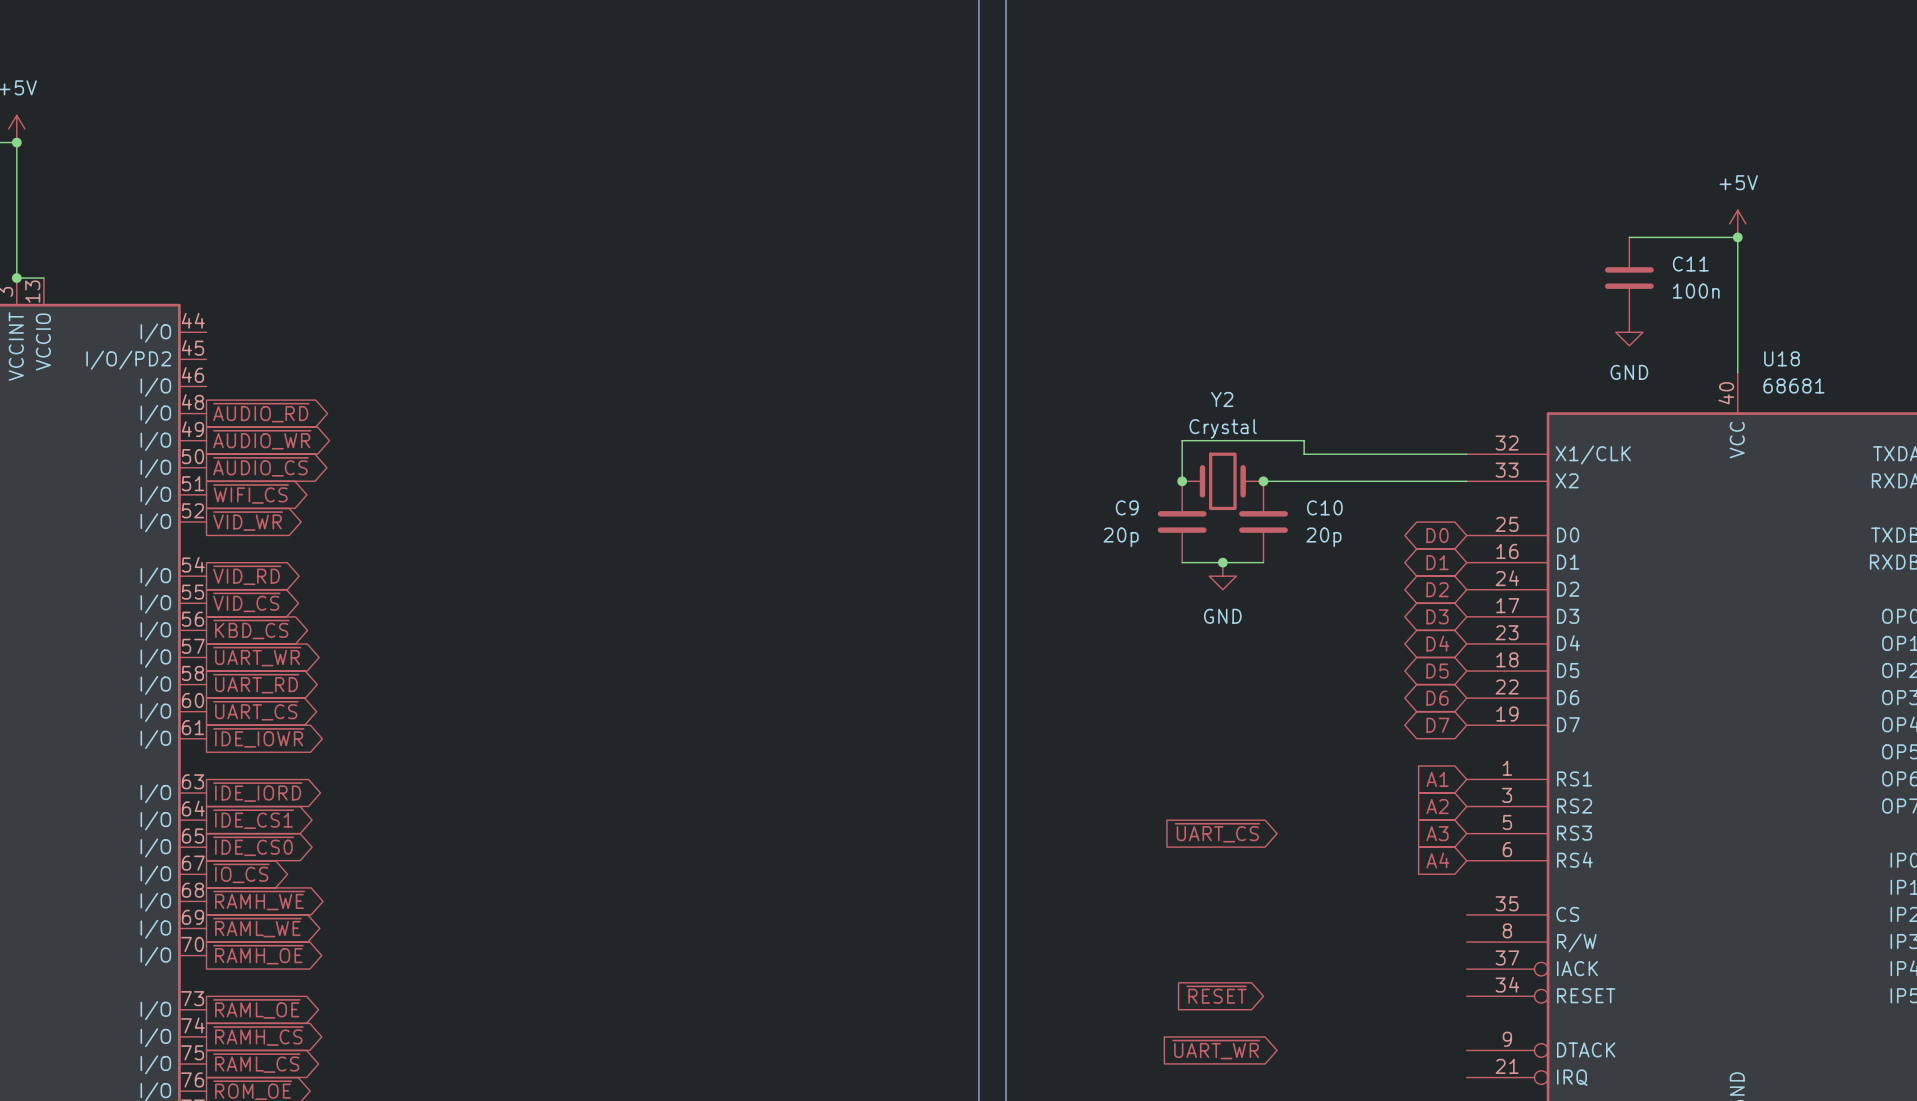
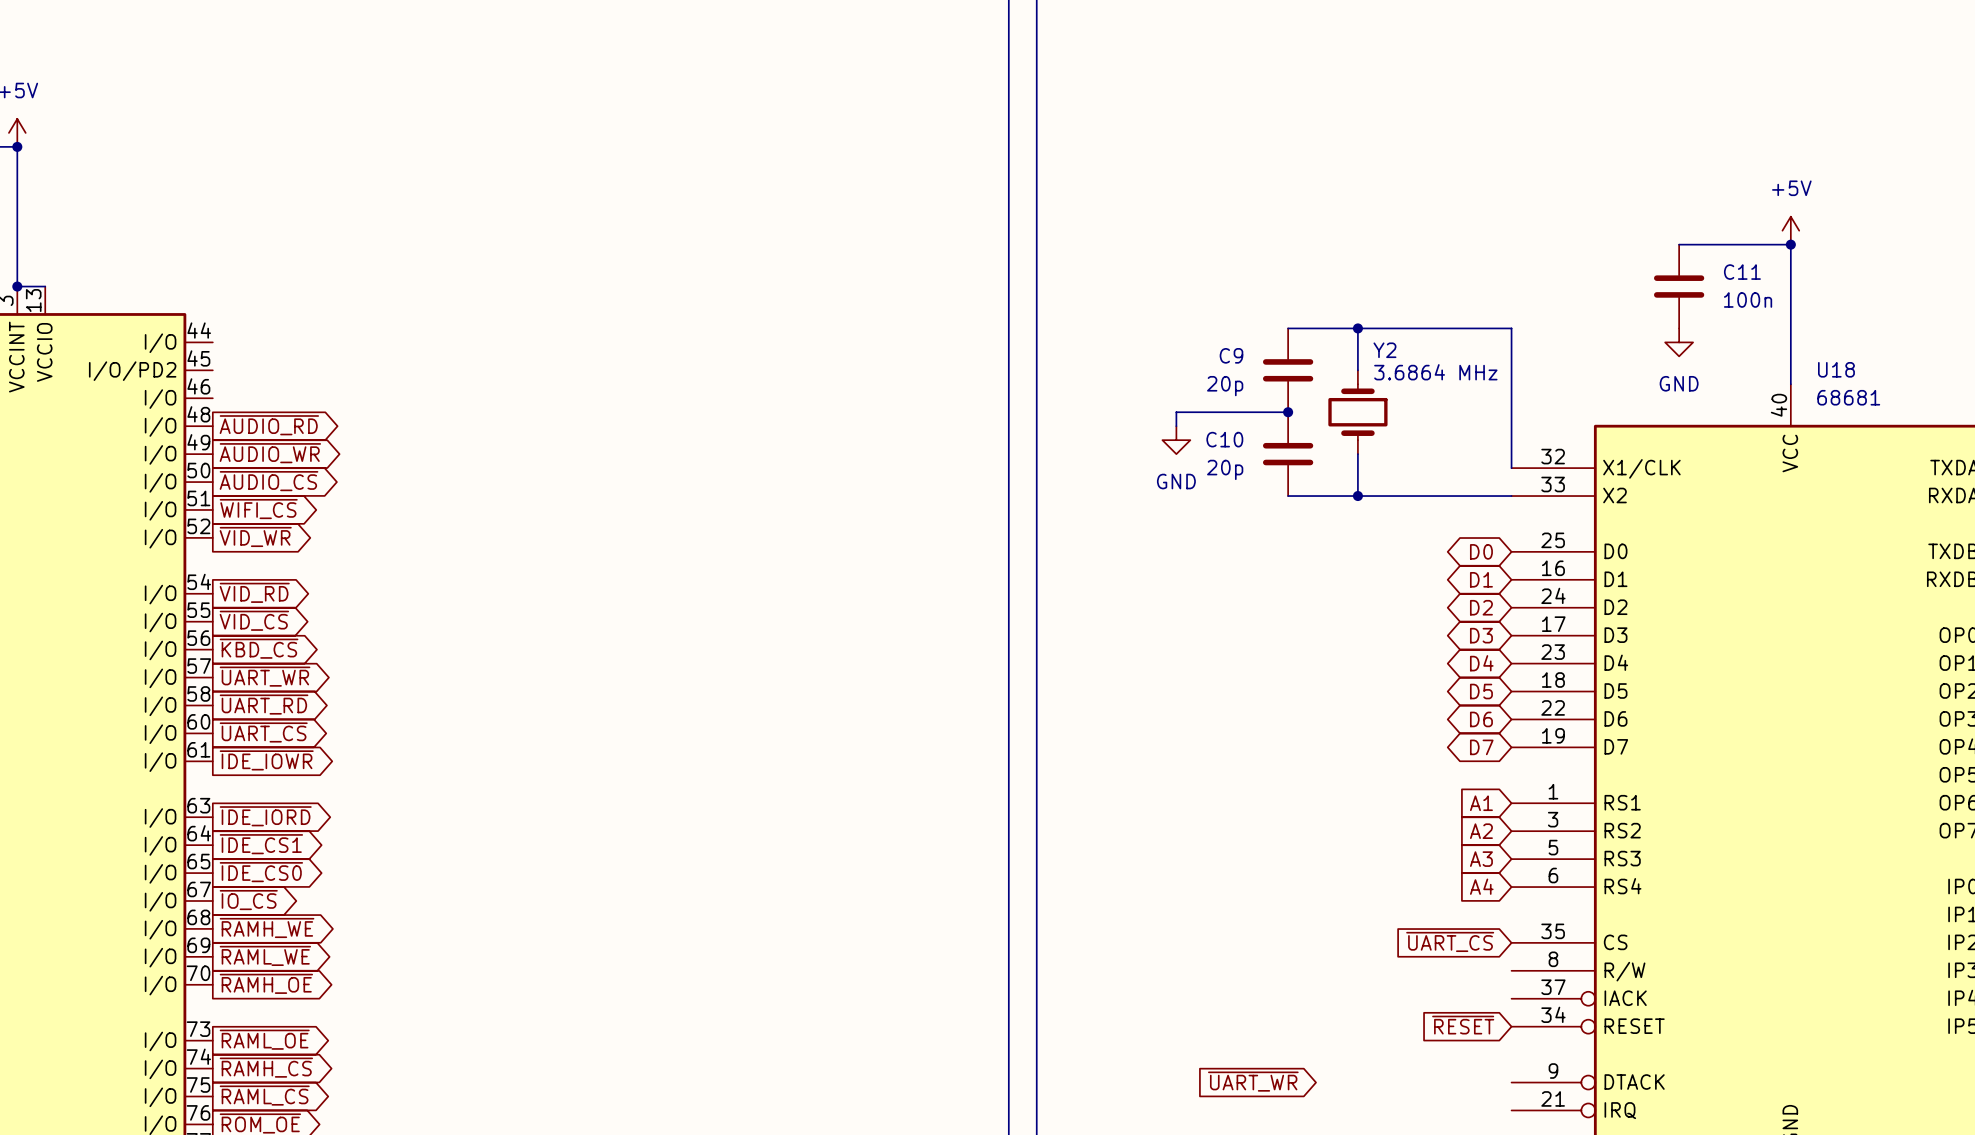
wire: none -> (1357, 328) (1357, 370)
junction: none -> (1357, 328)
Y2 name position: Y2 (1222, 399) -> Y2 (1384, 350)
wire: none -> (1288, 412) (1176, 412) (1176, 426)
junction: none -> (1288, 412)
Y2 value: Crystal (1223, 428) -> 3.6864 MHz (1435, 372)
wire: none -> (1357, 454) (1357, 496)
wire: (1466, 454) (1304, 454) (1304, 440) (1182, 440) (1182, 481) -> (1511, 468) (1511, 328) (1288, 328)
junction: (1182, 481) -> none
Y2 rotation: 0° (1222, 481) -> 90° clockwise (1357, 412)
Y2 position: (1222, 481) -> (1357, 412)
junction: (1263, 481) -> none
junction: none -> (1357, 496)
C10 name position: C10 (1324, 507) -> C10 (1224, 439)
C9 position: (1182, 521) -> (1288, 370)
C10 position: (1263, 521) -> (1288, 454)
C10 value position: 20p (1323, 537) -> 20p (1225, 469)
wire: (1182, 562) (1263, 562) -> none
junction: (1222, 562) -> none
power symbol position: GND (1222, 576) -> GND (1176, 440)
global label position: ~{UART_CS} (1217, 832) -> ~{UART_CS} (1450, 941)
global label position: ~{RESET} (1216, 994) -> ~{RESET} (1463, 1025)

